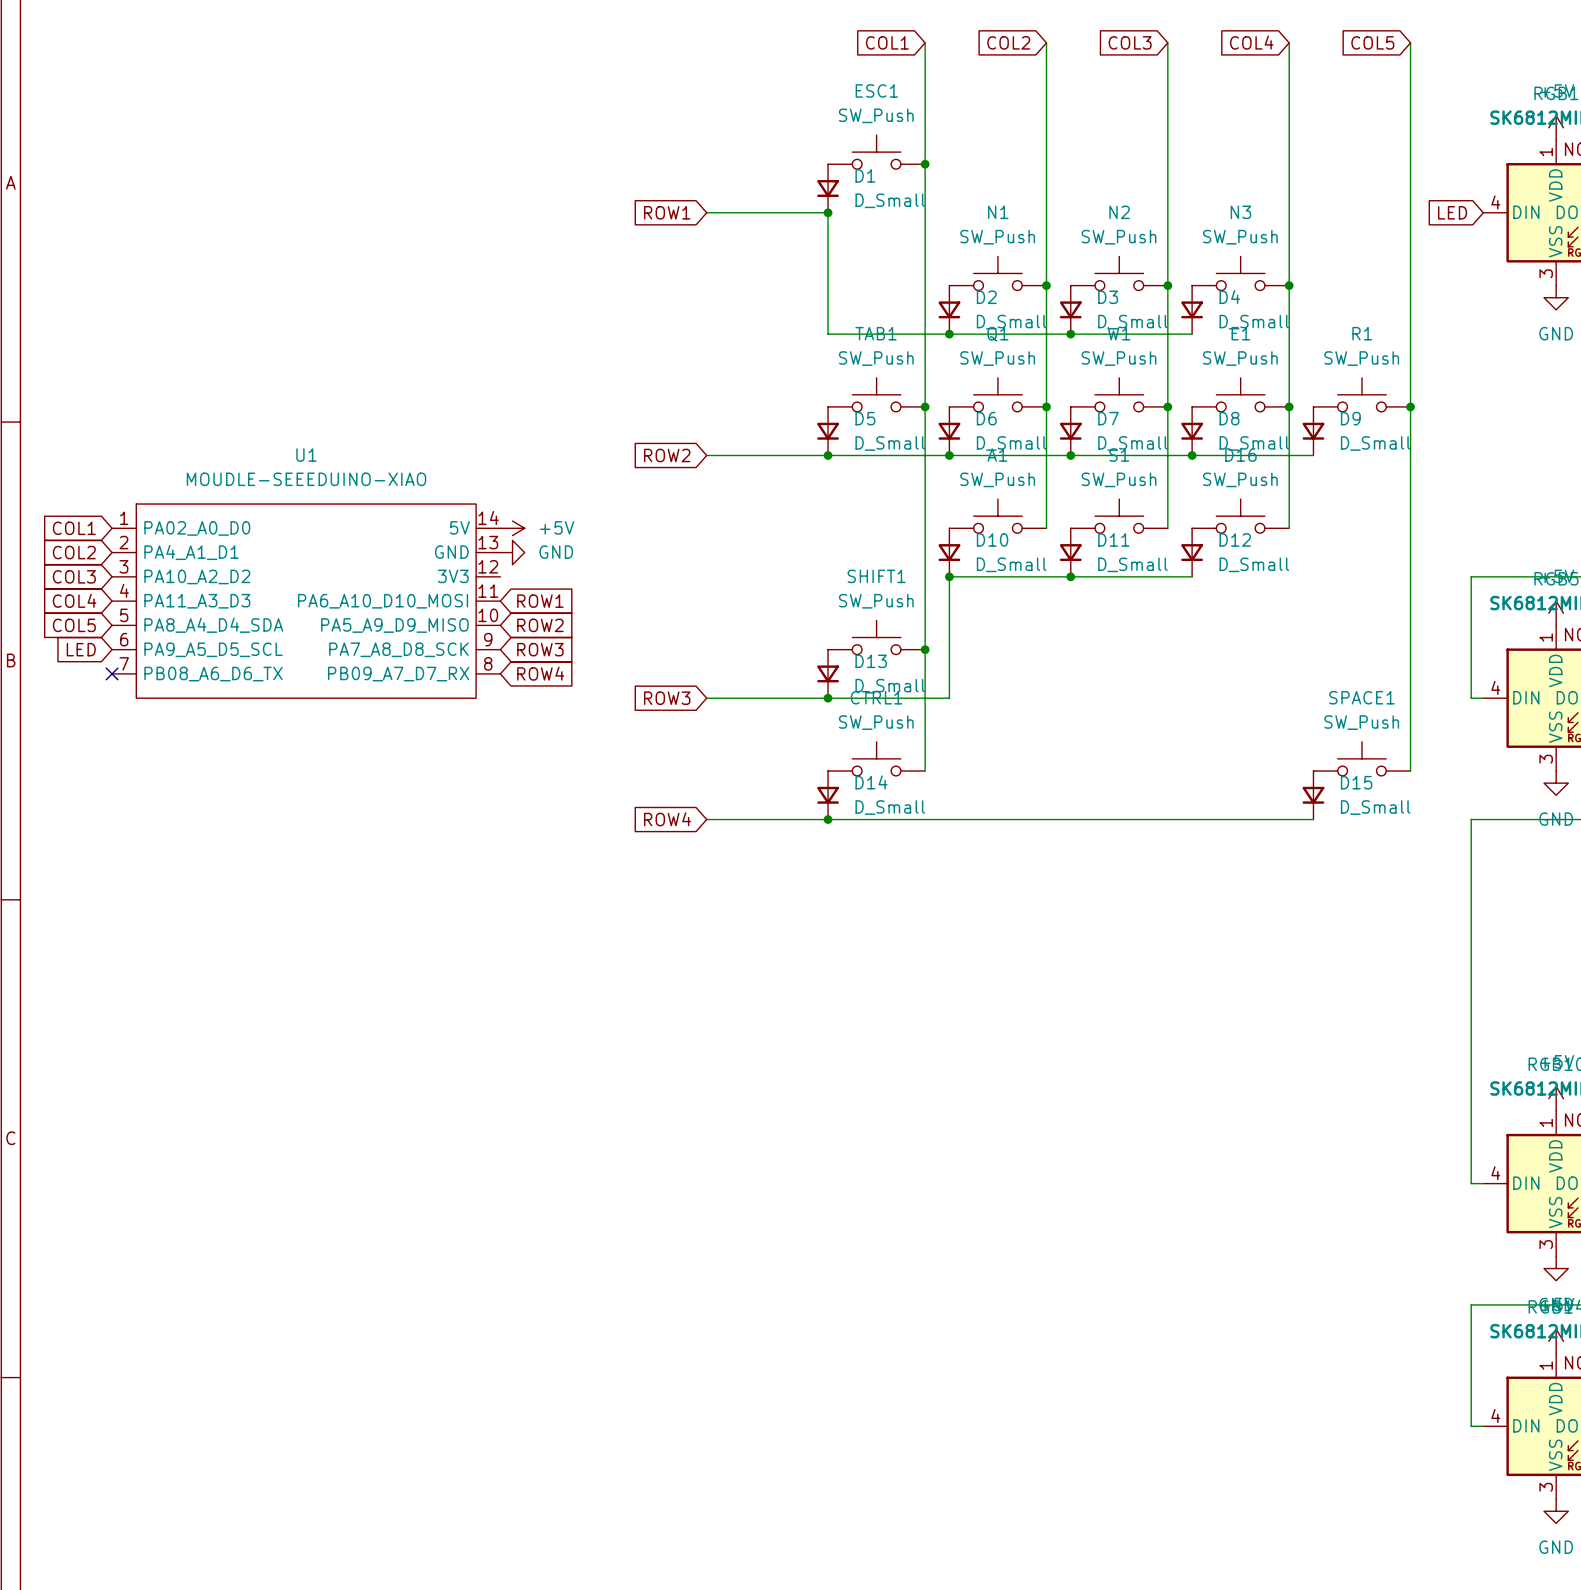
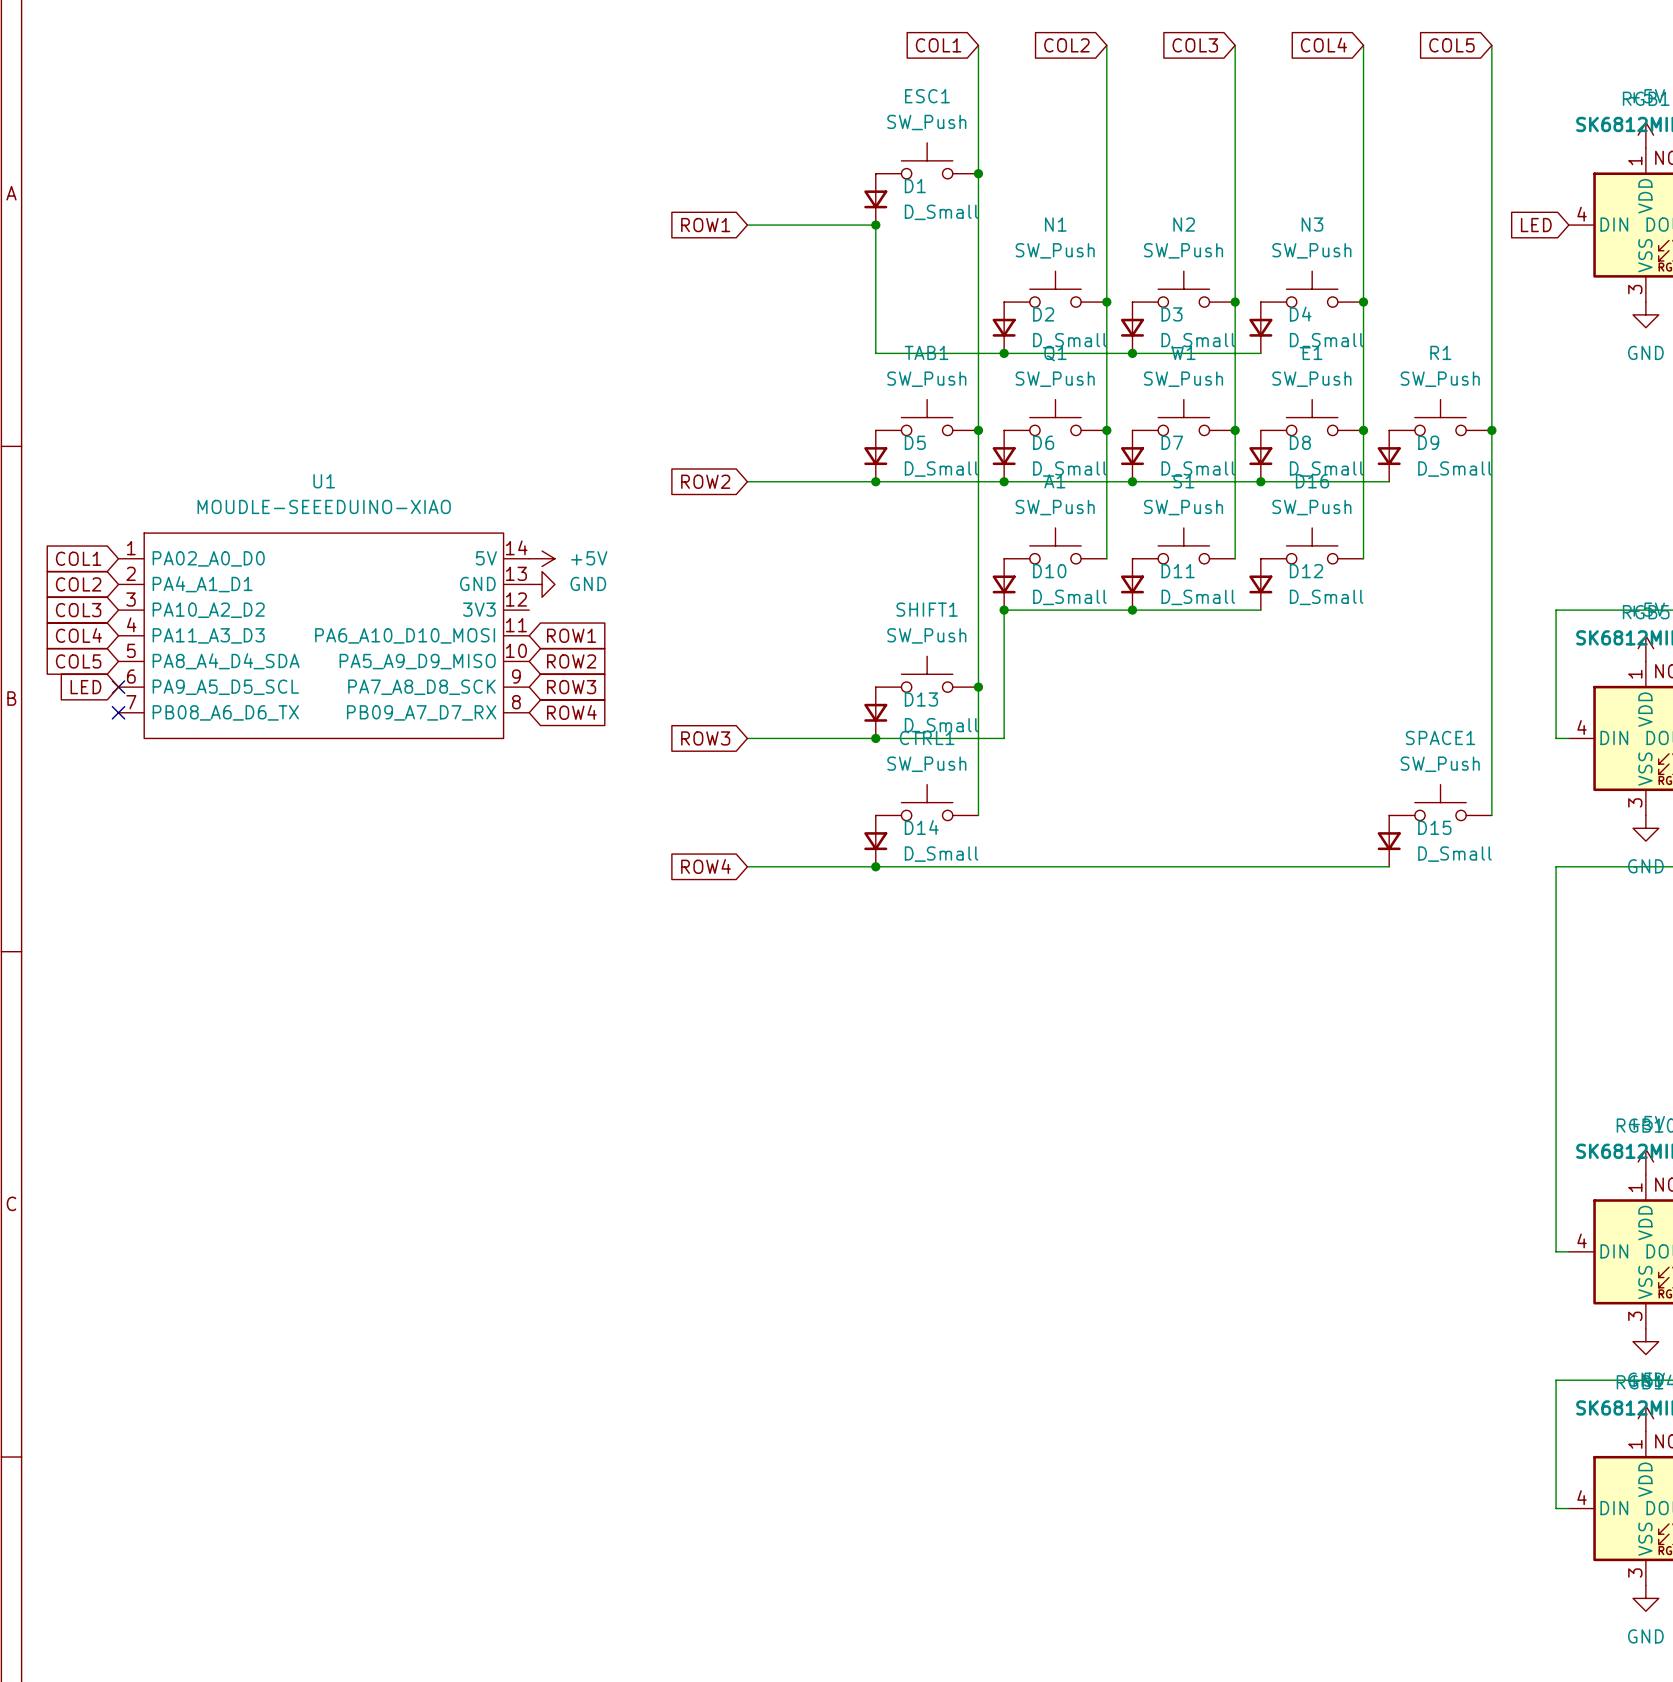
no-connect mark: none -> (118, 687)

